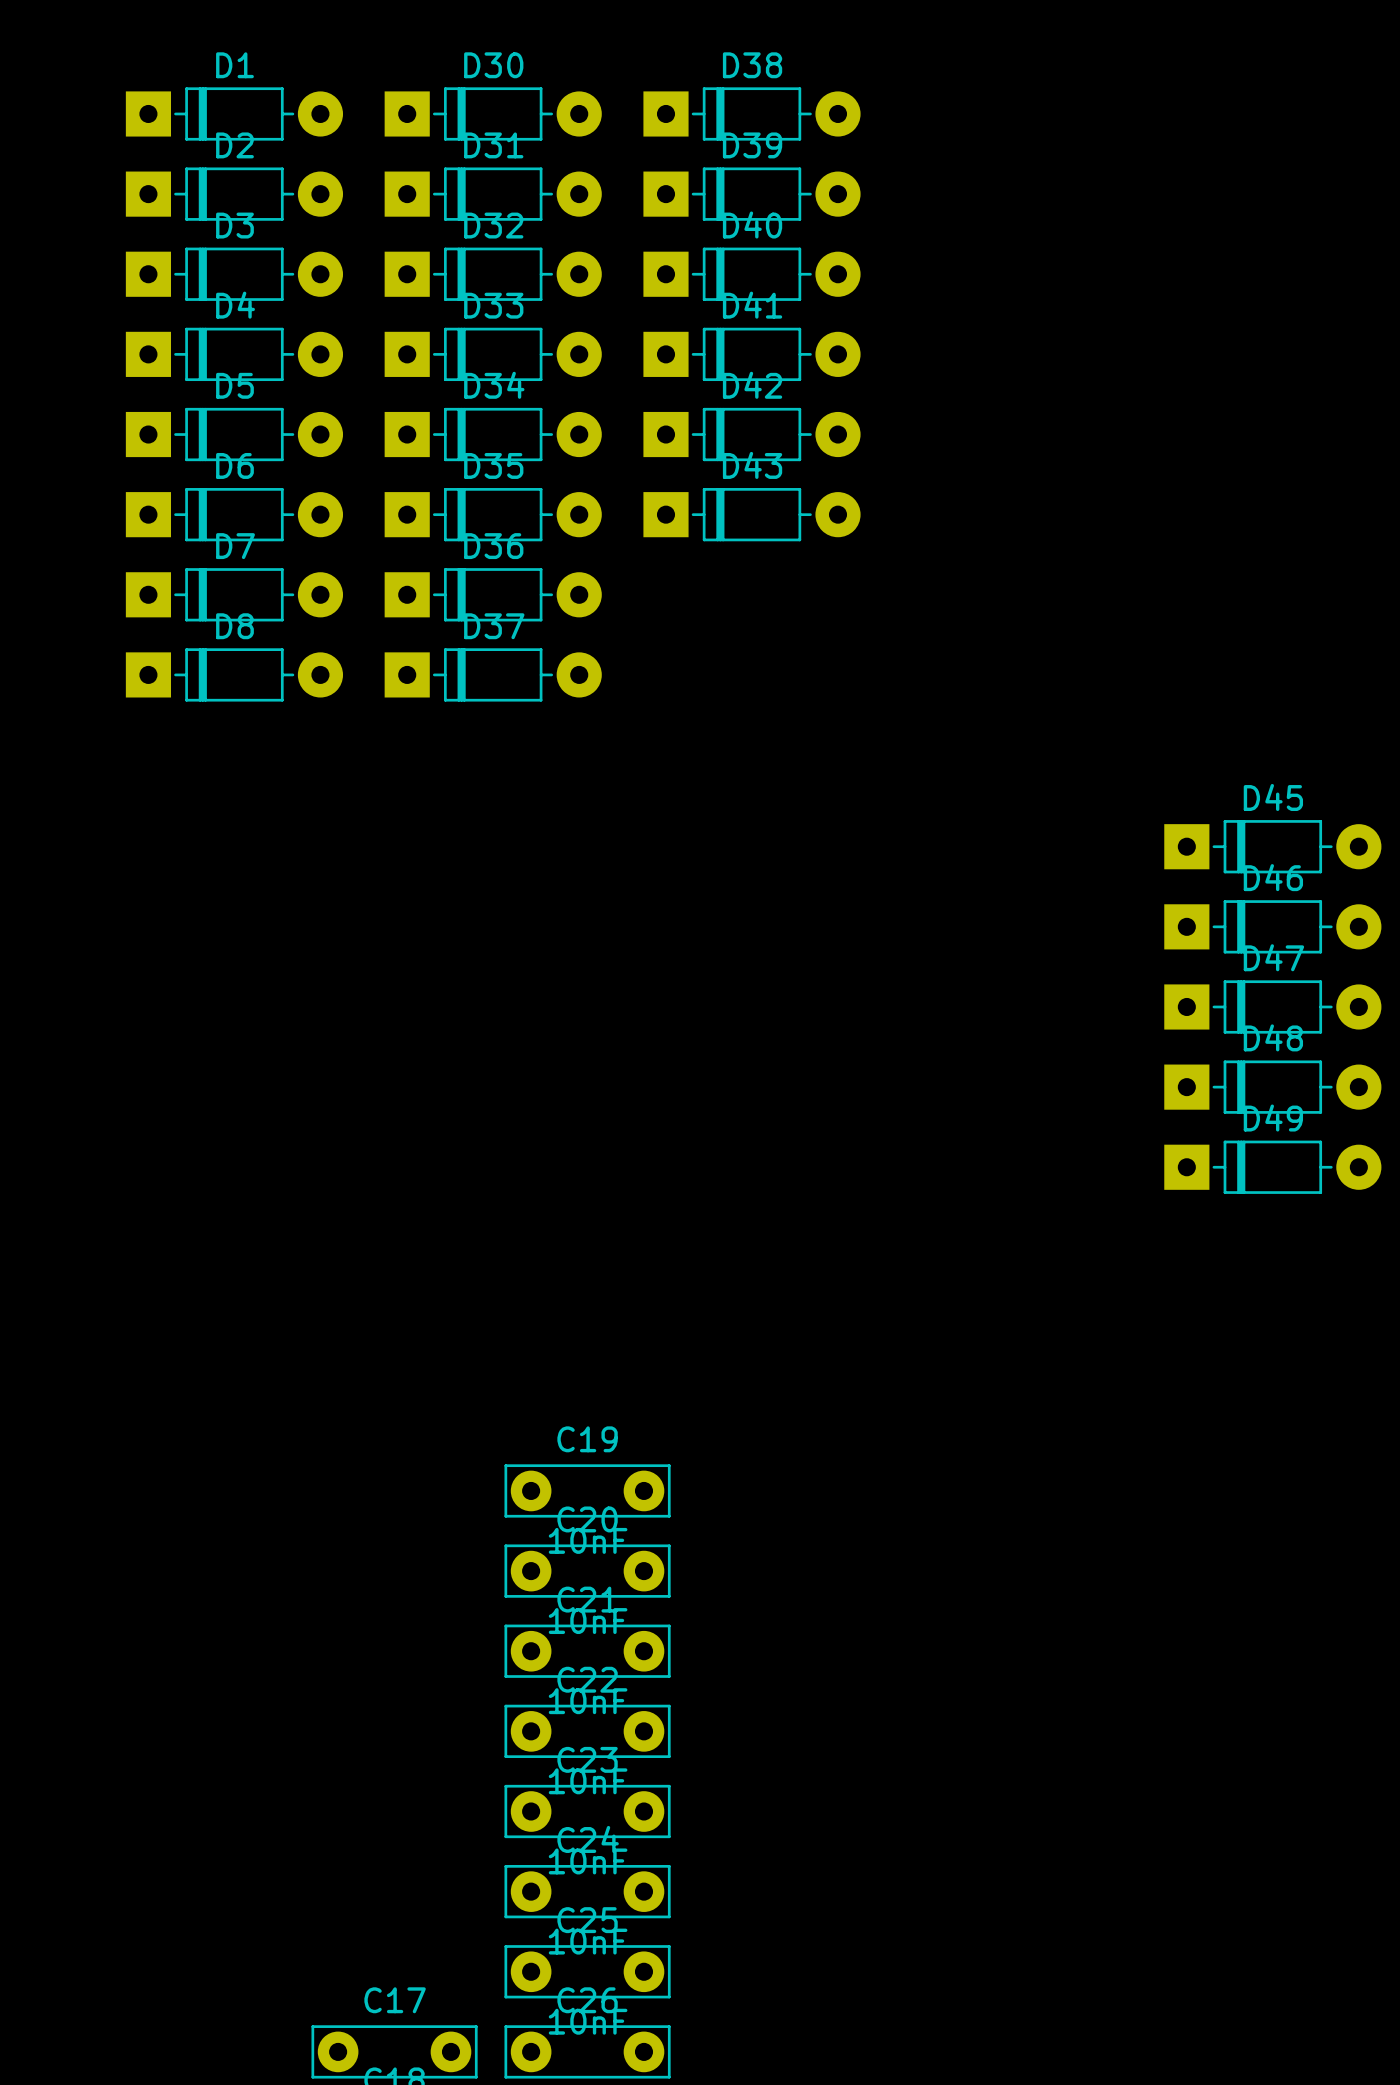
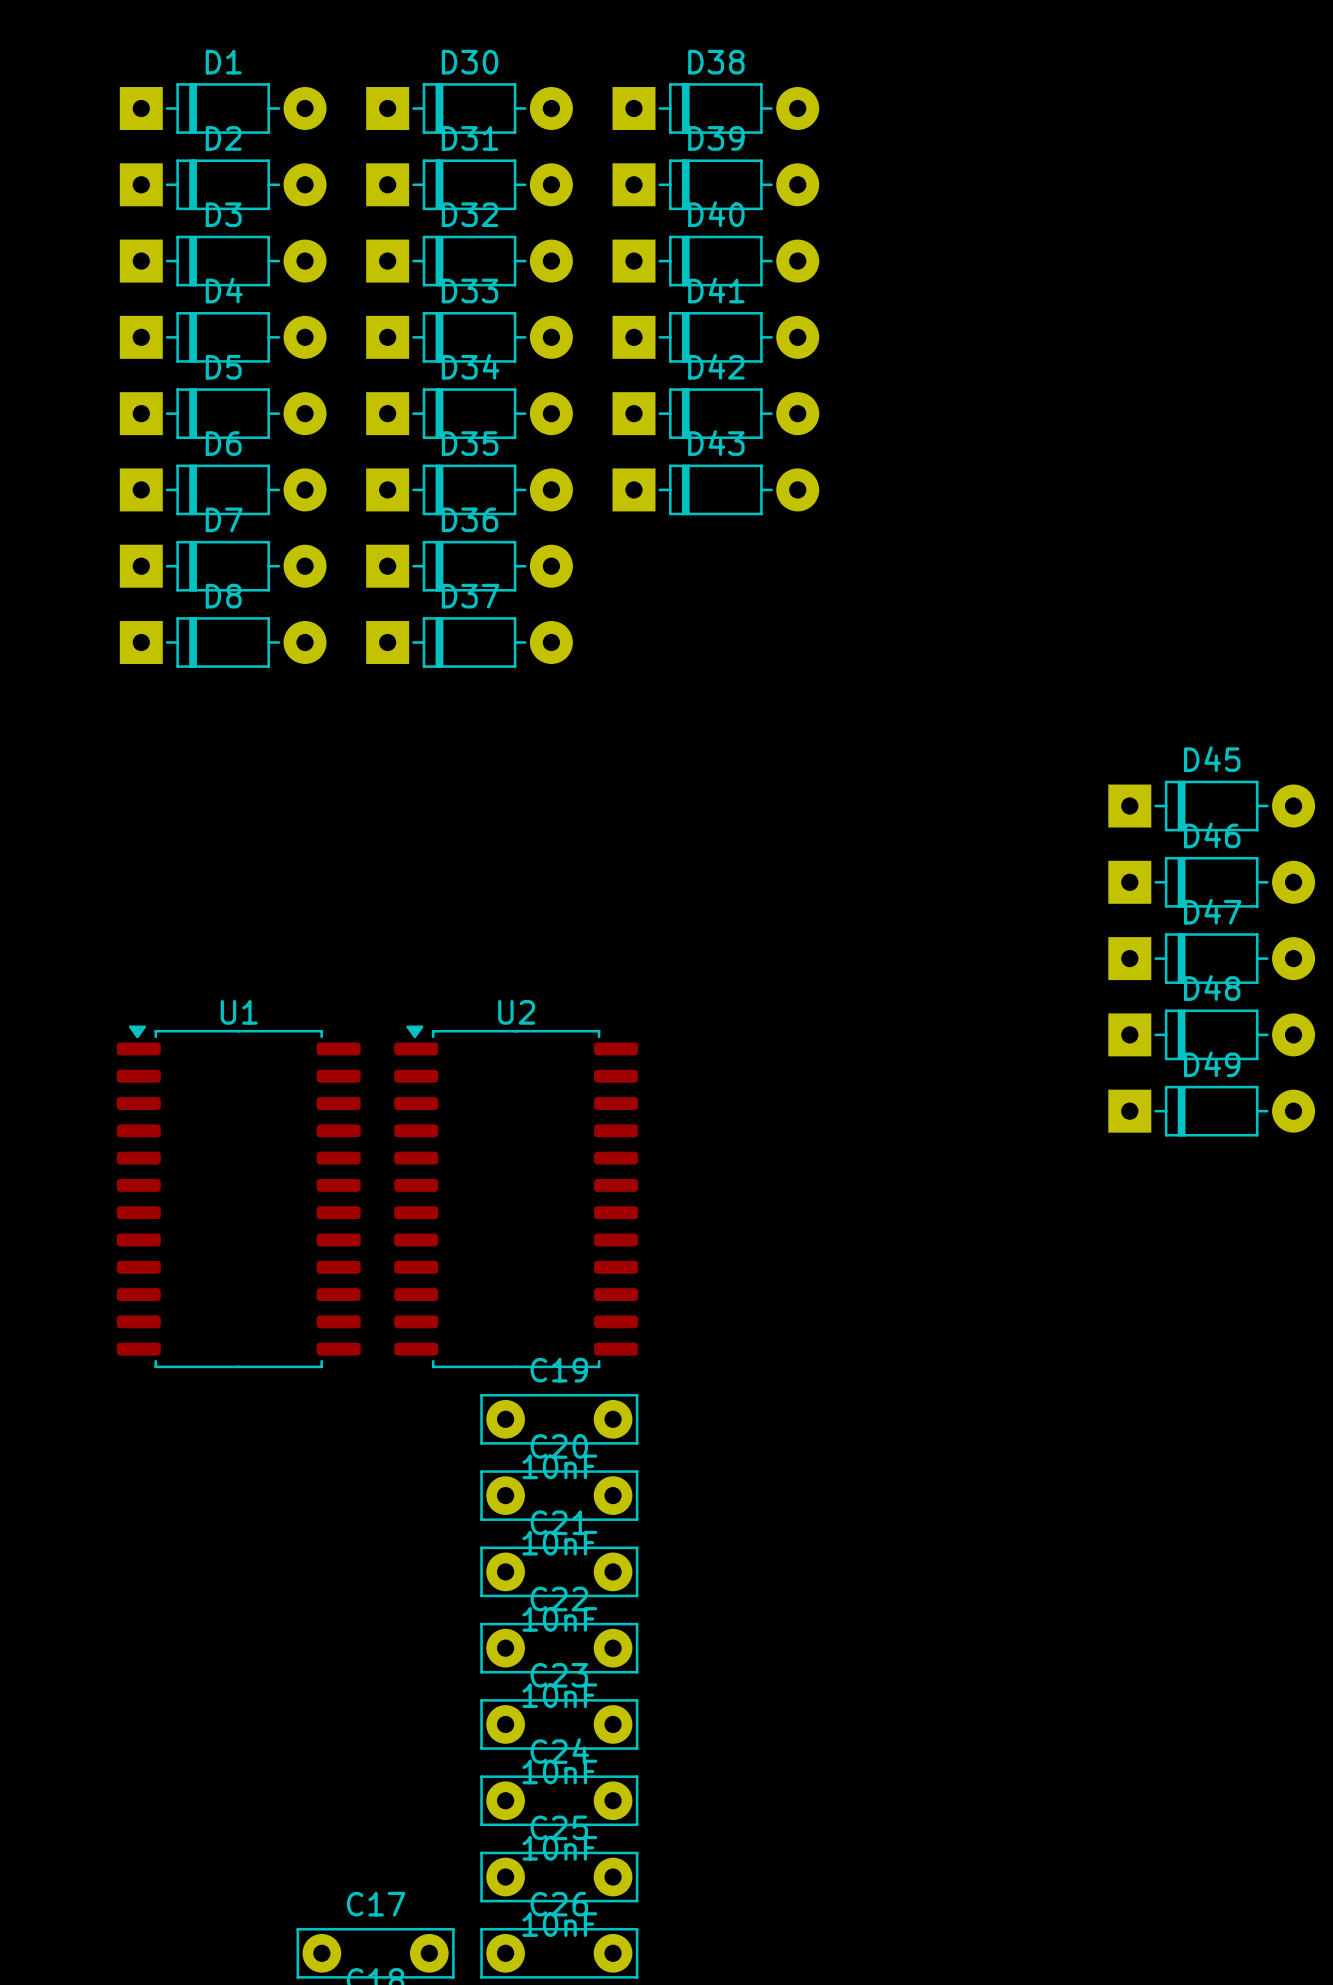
U1: none -> (238, 1196)
U2: none -> (516, 1196)

